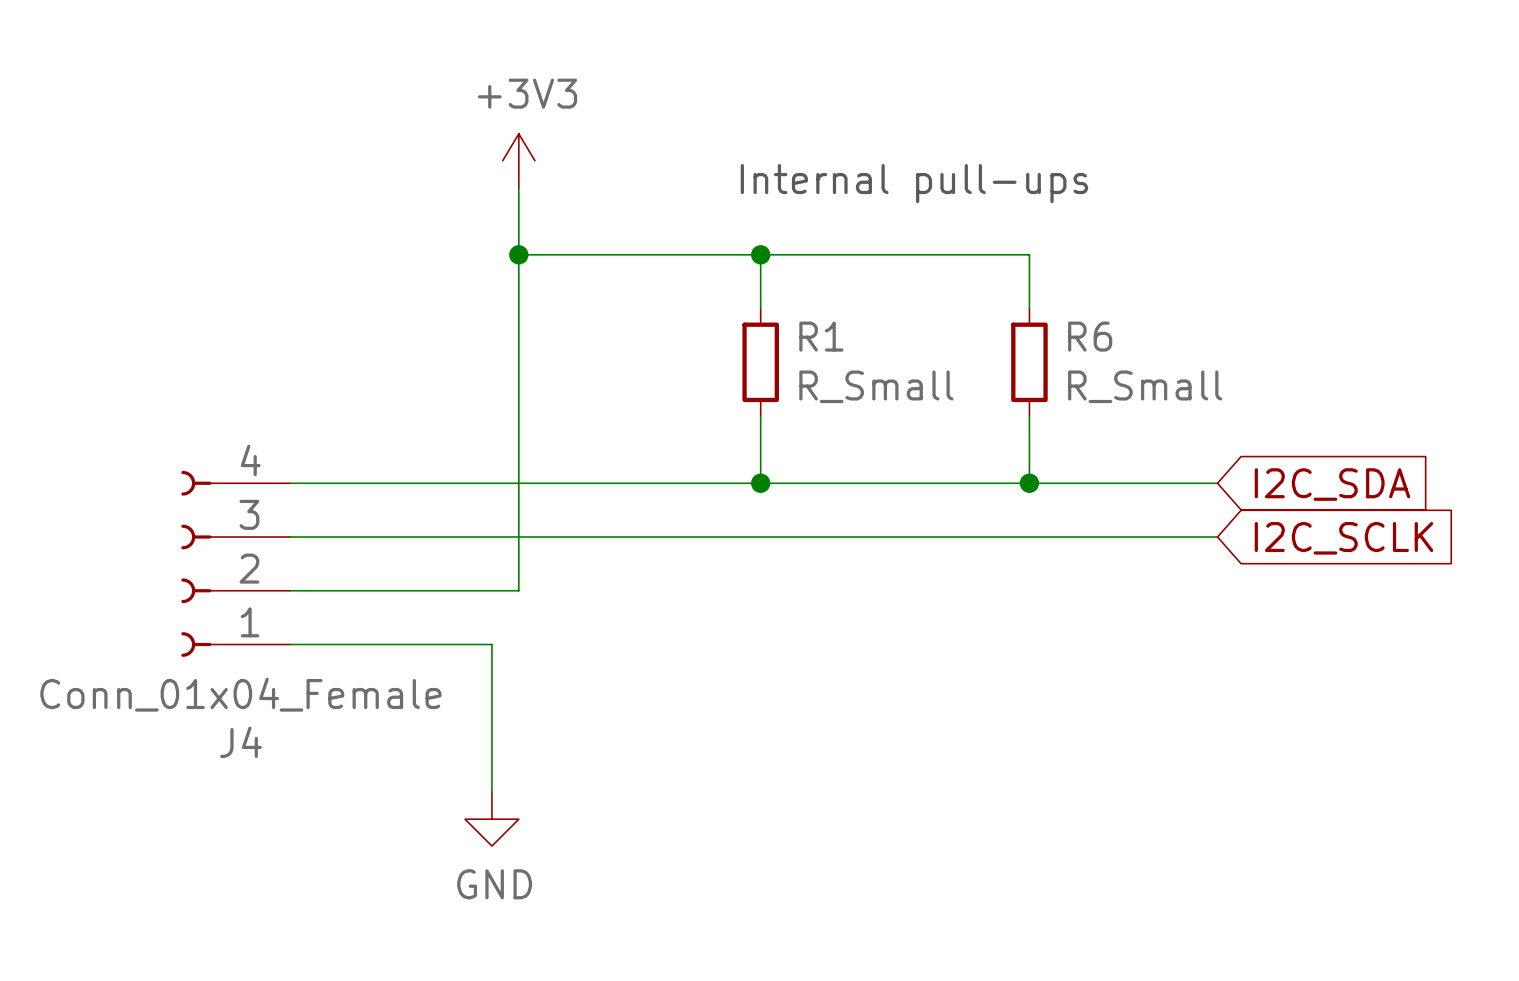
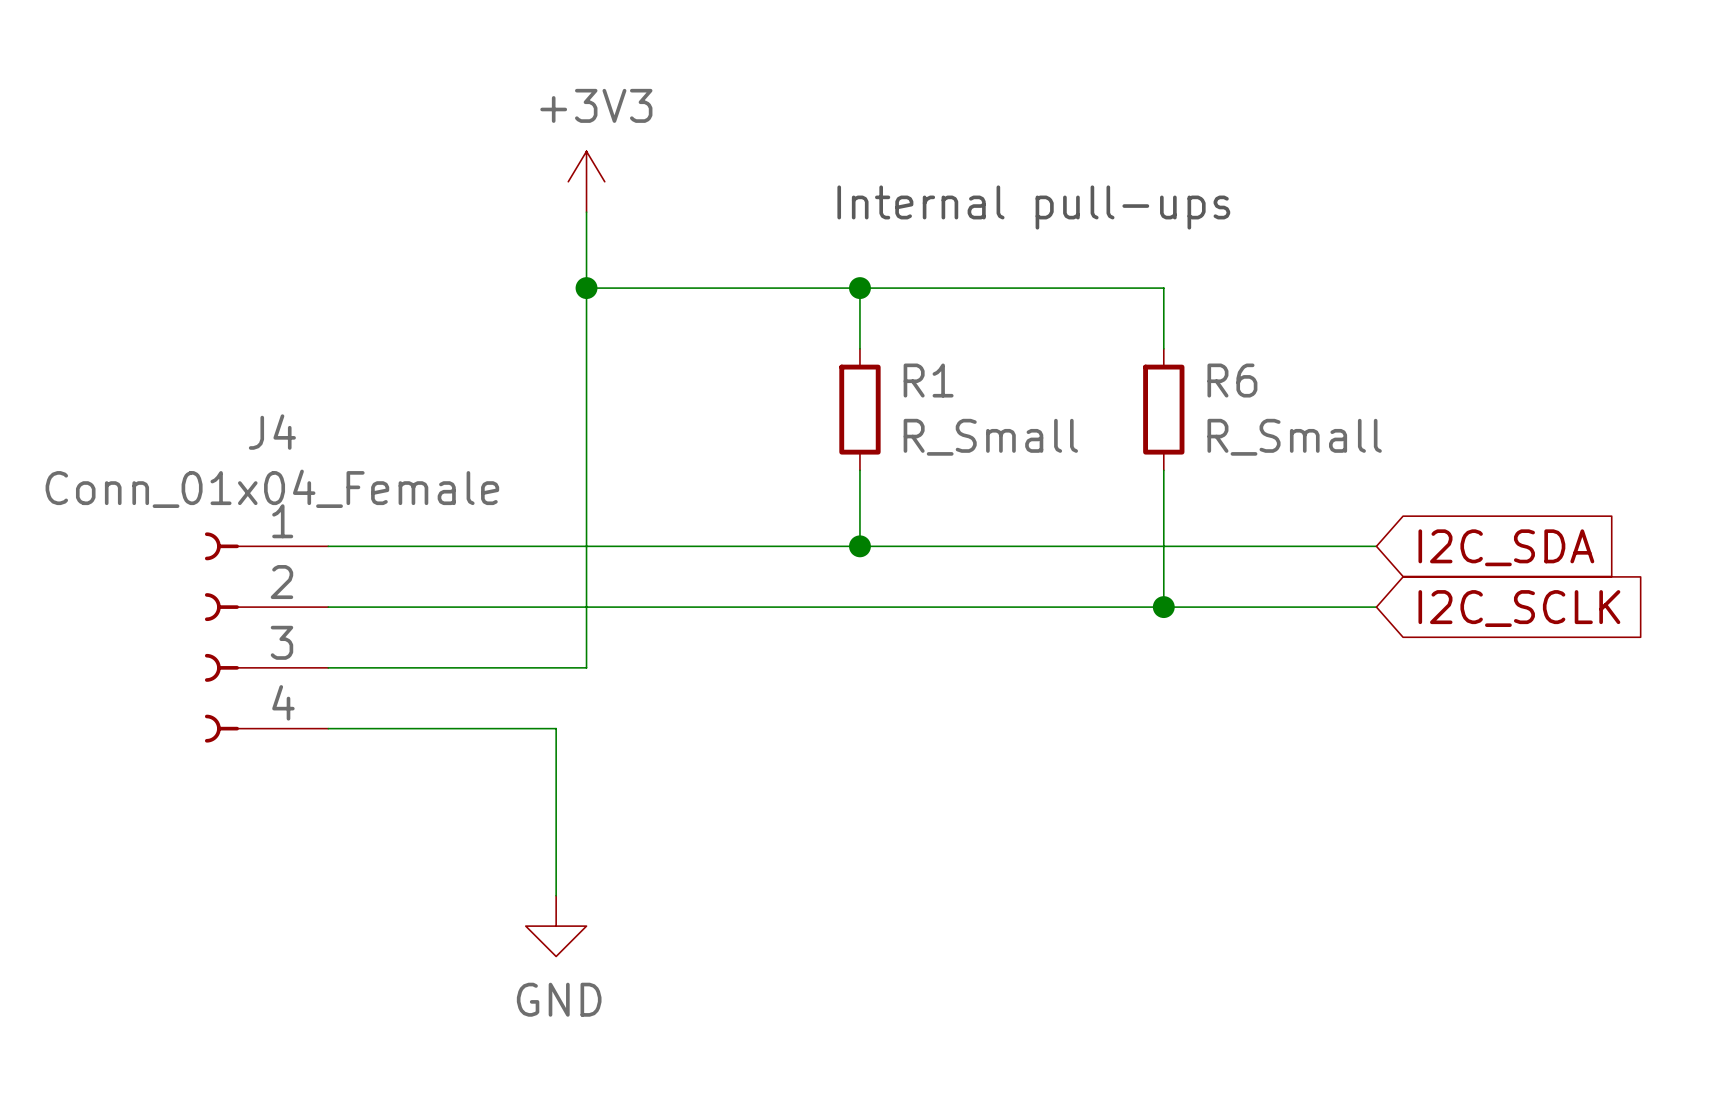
wire: none -> (1163, 546) (1163, 607)
junction position: (1029, 483) -> (1163, 607)
J4 flip: as is (196, 563) -> up-down (221, 637)

